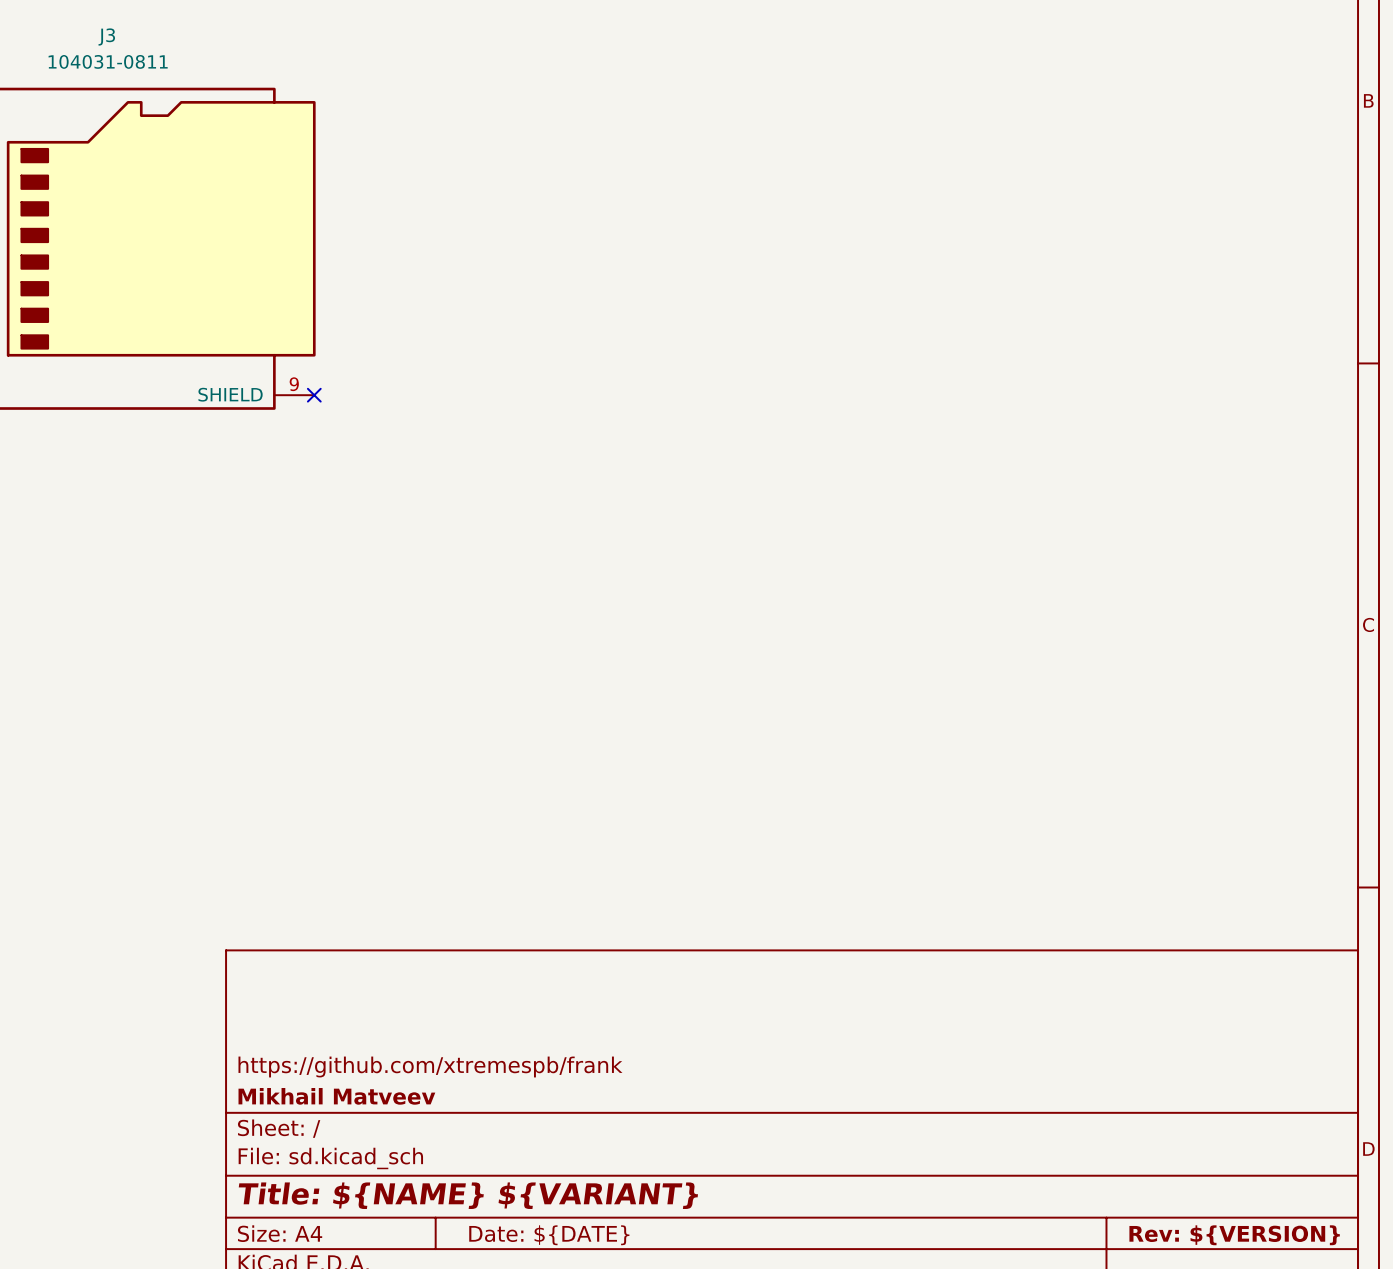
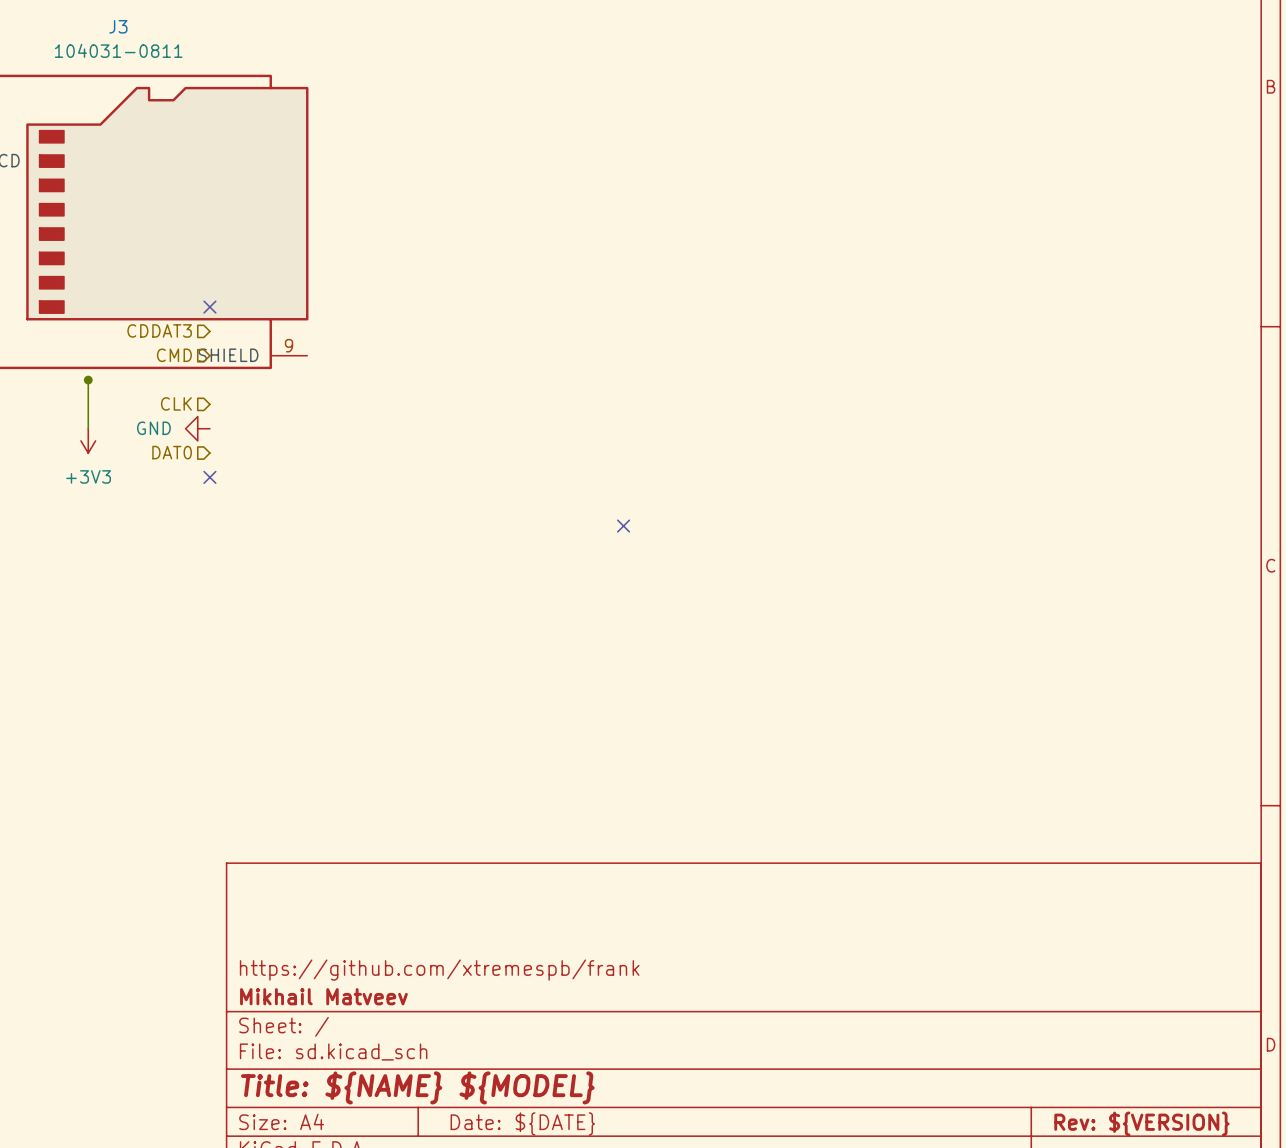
no-connect mark: none -> (209, 307)
hierarchical label: none -> CDDAT3 (159, 330)
hierarchical label: none -> CMD (174, 355)
no-connect mark: (314, 395) -> none
wire: none -> (88, 380) (88, 428)
junction: none -> (88, 380)
hierarchical label: none -> CLK (176, 403)
power symbol: none -> GND (197, 428)
power symbol: none -> +3V3 (88, 440)
hierarchical label: none -> DAT0 (172, 452)
no-connect mark: none -> (209, 477)
no-connect mark: none -> (623, 526)
title block: Title: ${NAME} ${VARIANT} (468, 1195) -> Title: ${NAME} ${MODEL} (417, 1087)

